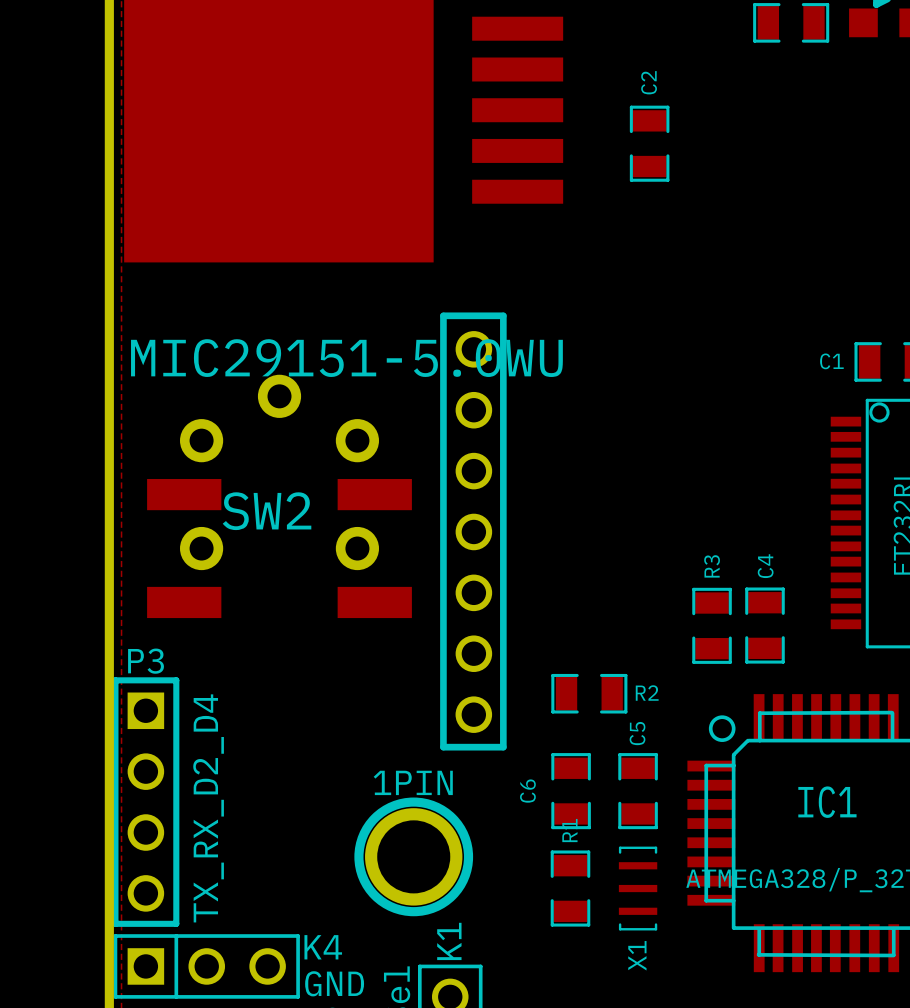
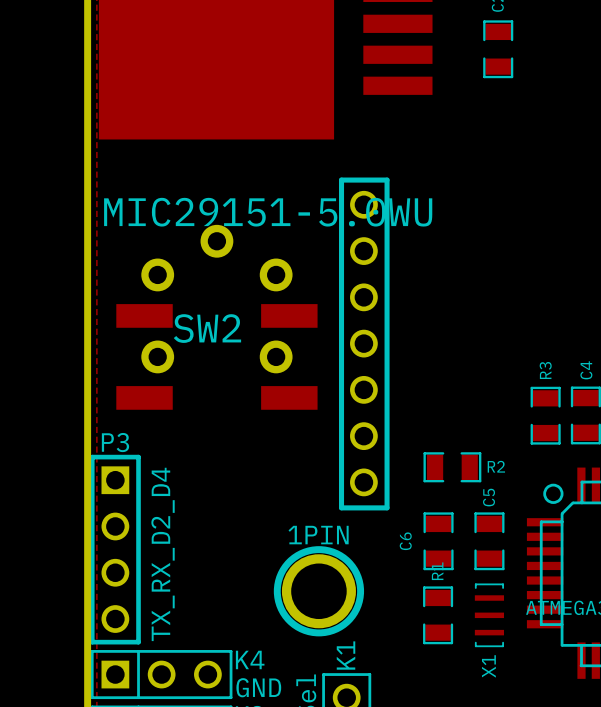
part rotation: 0° (473, 531) -> 180° (364, 343)

